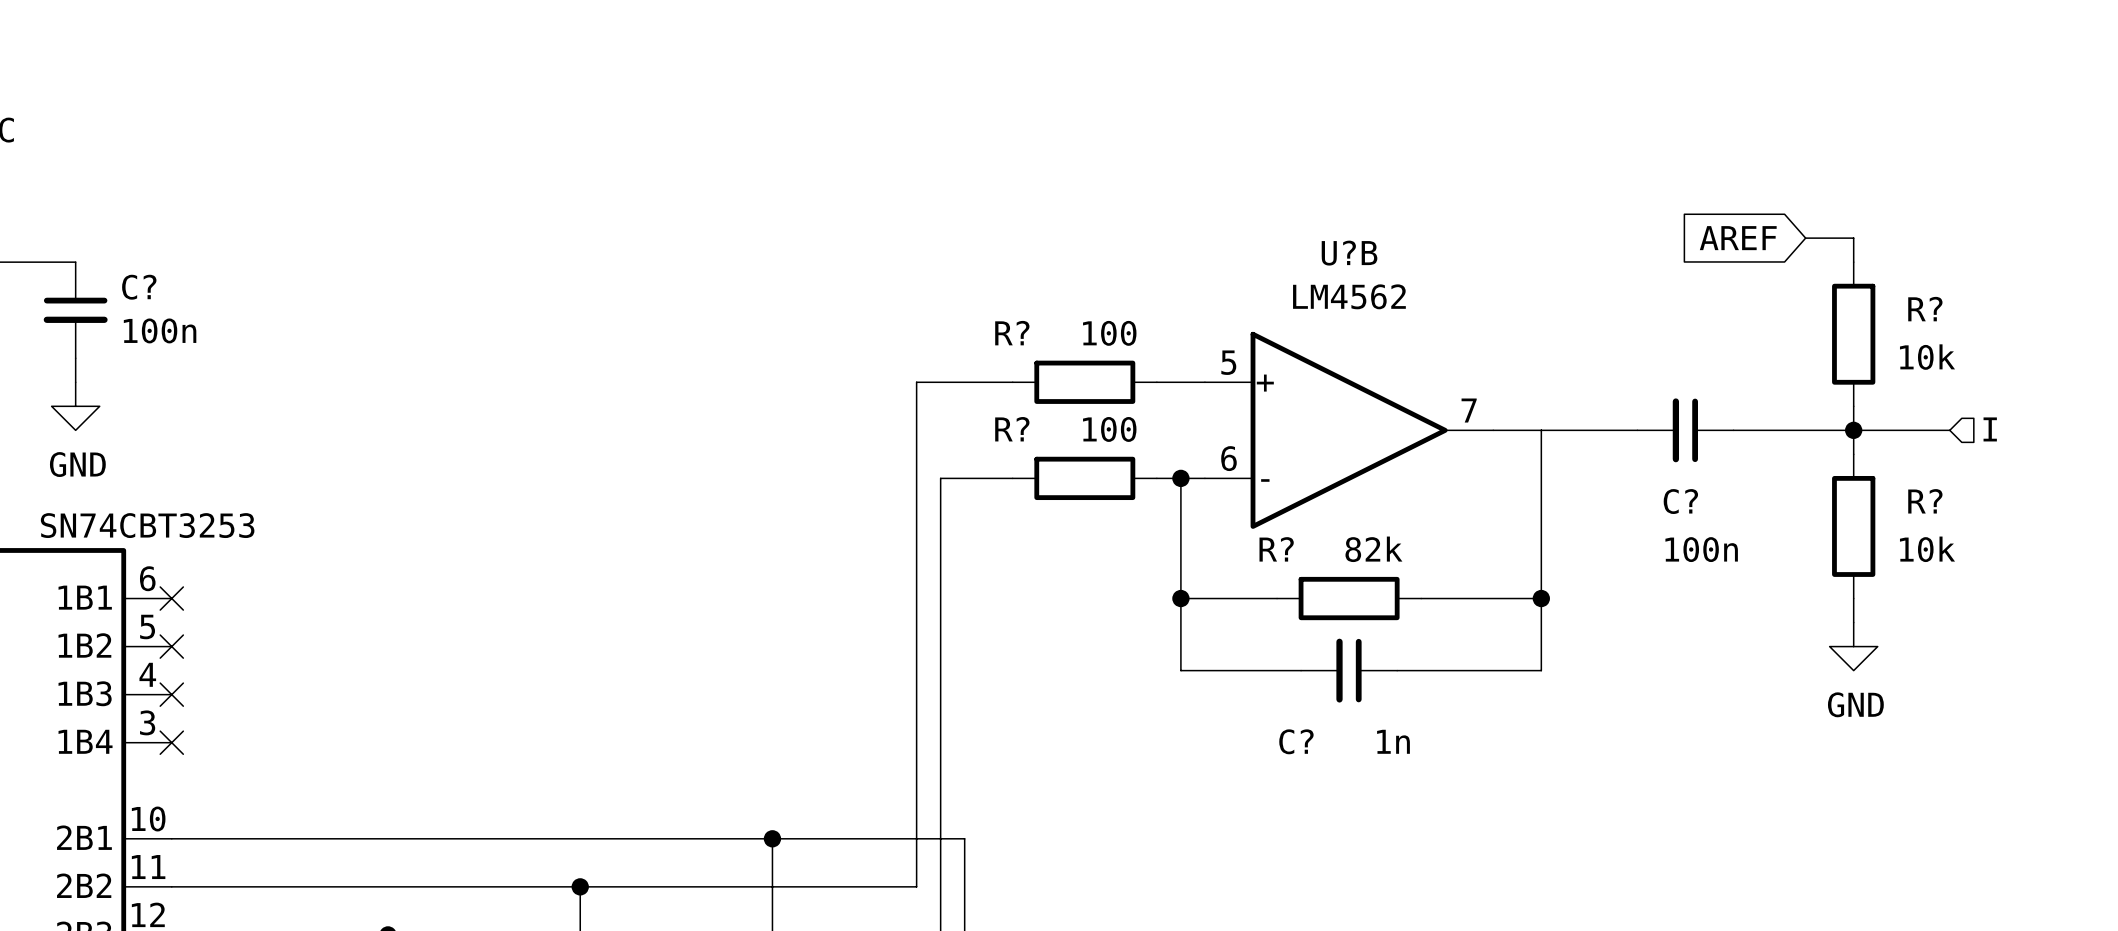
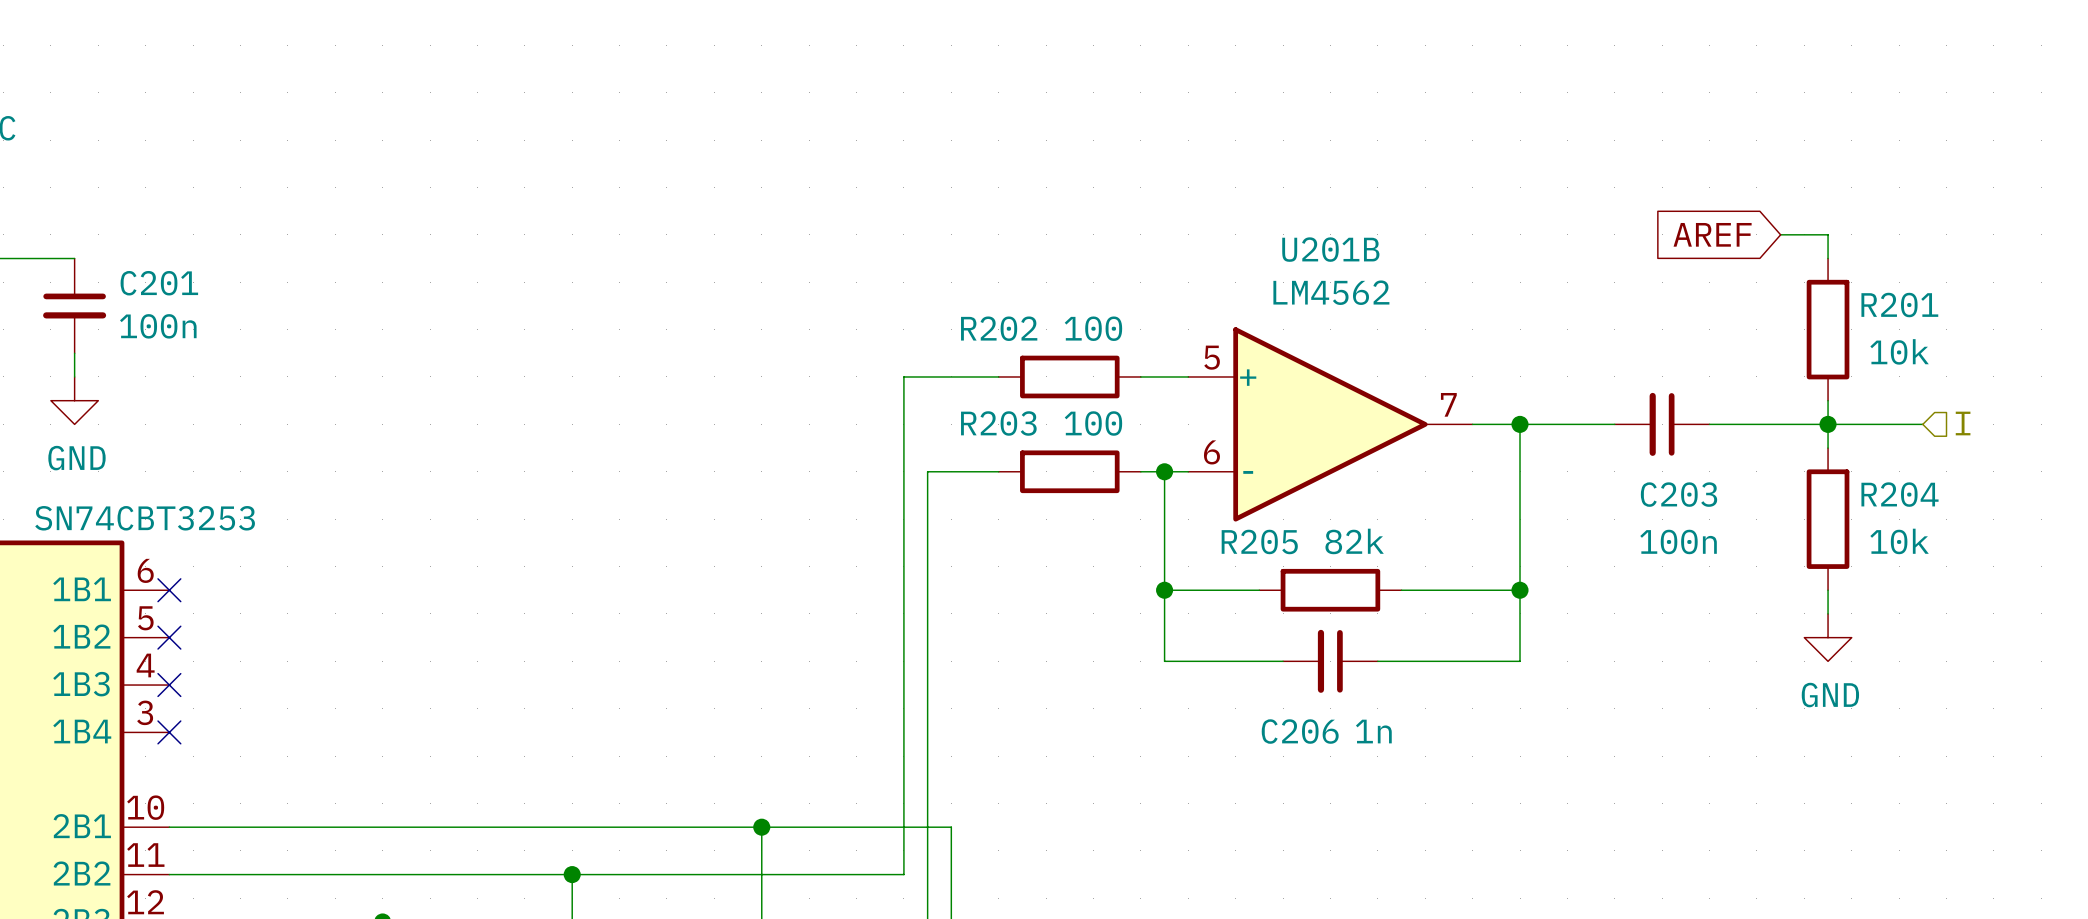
U?B name: U?B (1349, 253) -> U201B (1330, 249)
C? name: C? (139, 287) -> C201 (159, 283)
R? name: R? (1925, 309) -> R201 (1899, 305)
R? name: R? (1012, 333) -> R202 (999, 328)
R? name: R? (1012, 429) -> R203 (998, 423)
junction: none -> (1520, 424)
C? name: C? (1680, 501) -> C203 (1679, 494)
R? name: R? (1925, 501) -> R204 (1900, 494)
R? name: R? (1276, 549) -> R205 (1259, 541)
C? name: C? (1296, 741) -> C206 (1300, 731)

